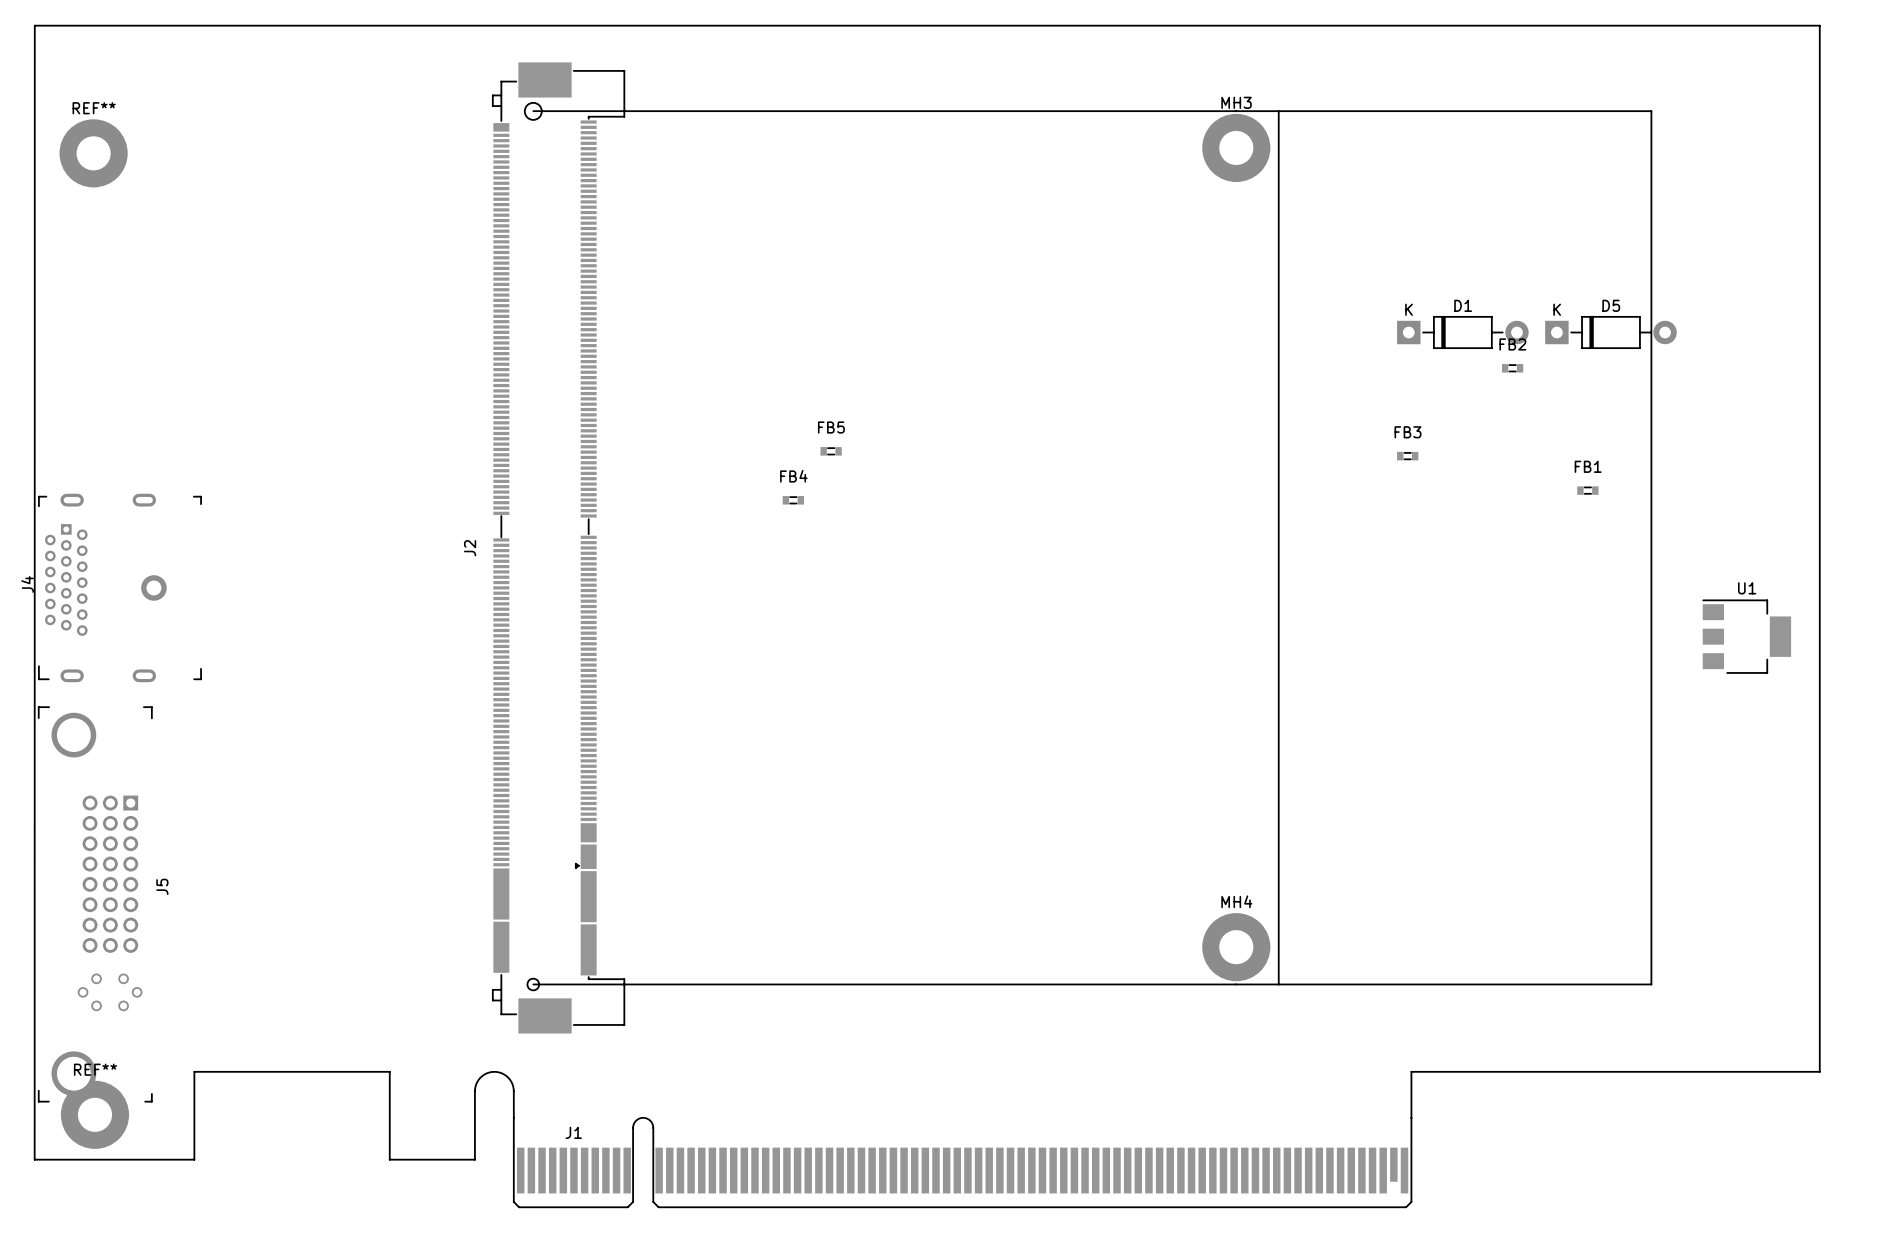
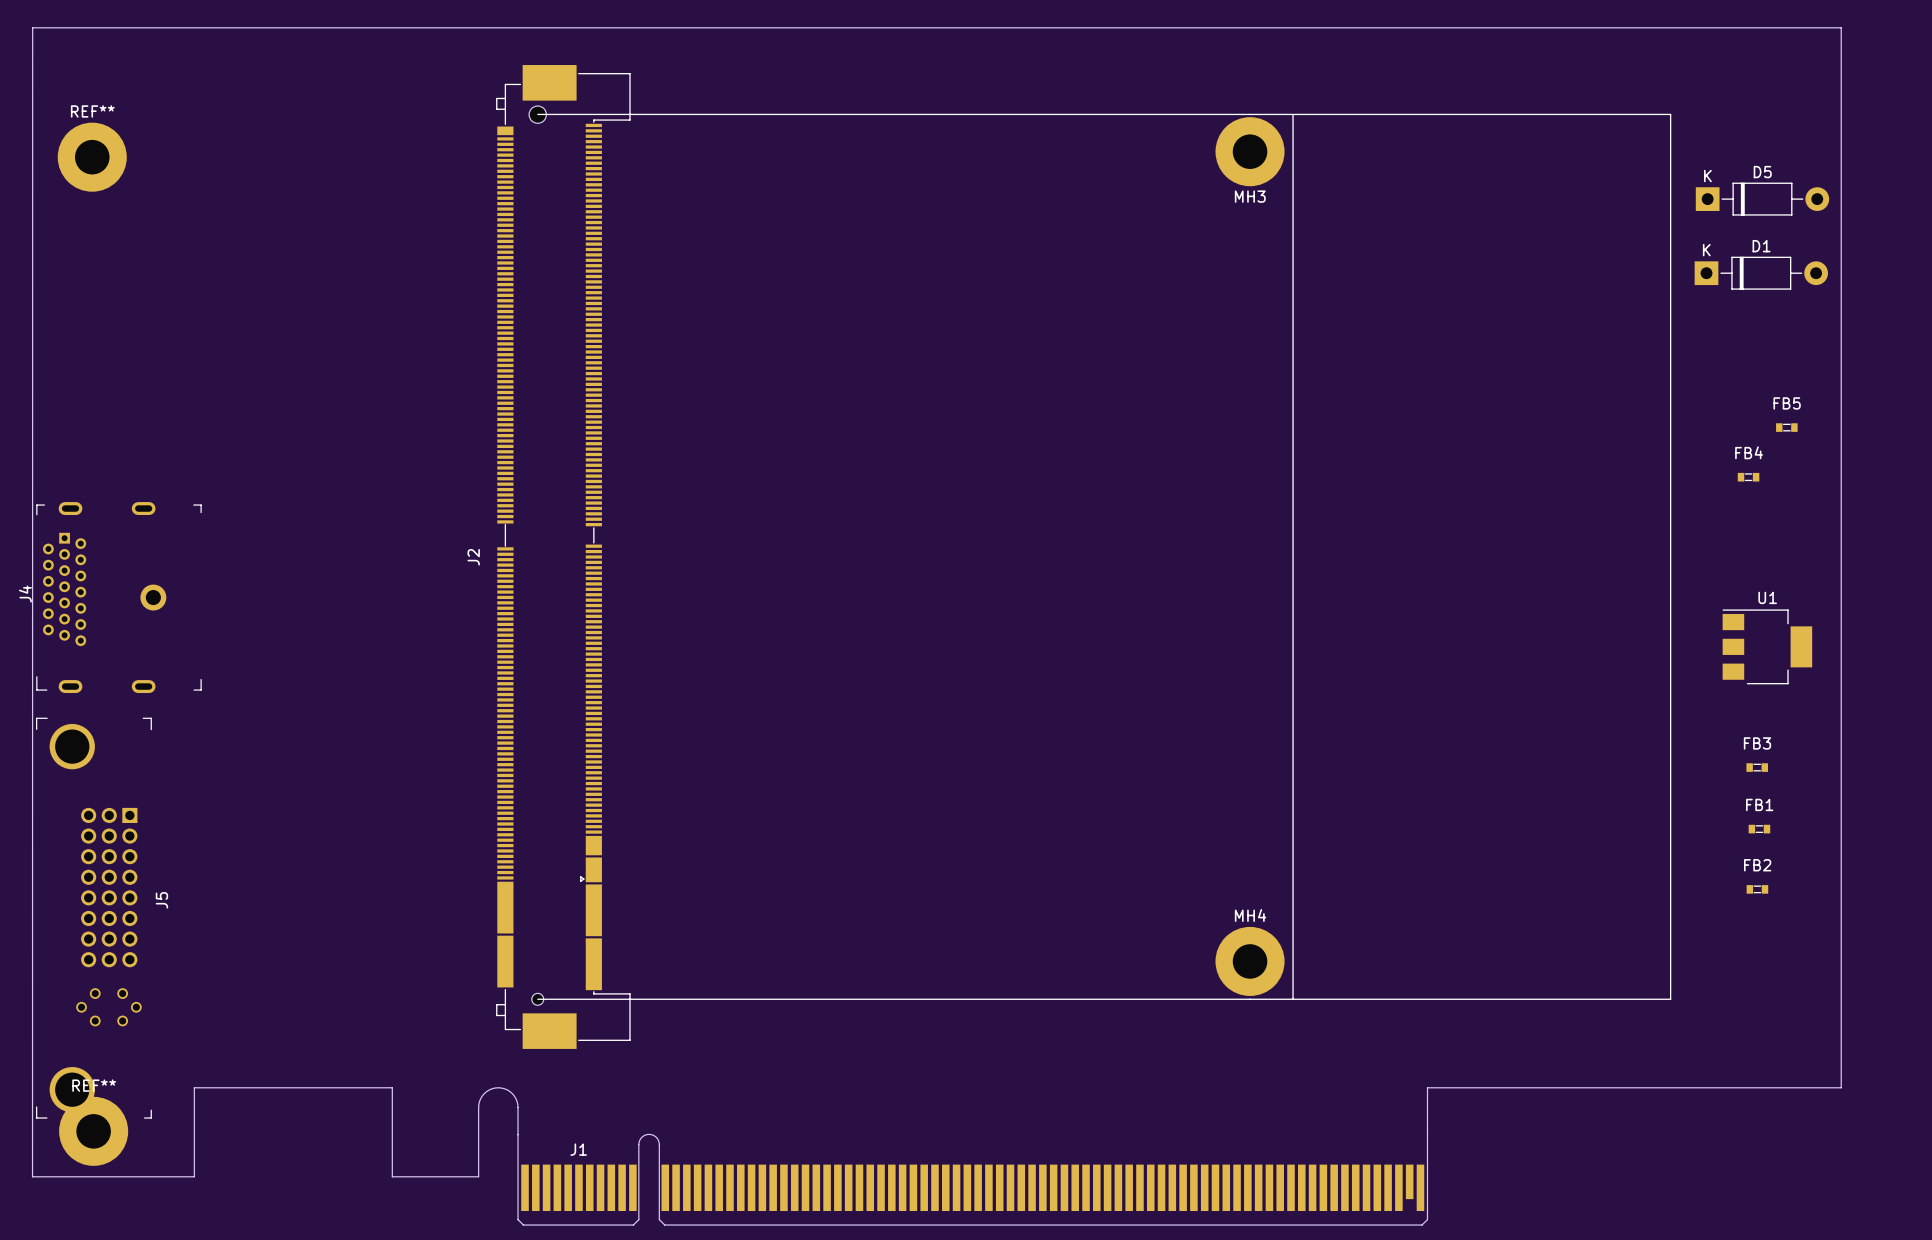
MH3 name position: MH3 (1236, 102) -> MH3 (1250, 196)
D1 position: (1462, 332) -> (1761, 273)
D5 position: (1610, 332) -> (1762, 199)
FB2 position: (1512, 368) -> (1757, 889)
FB5 position: (831, 451) -> (1786, 427)
FB3 position: (1407, 456) -> (1757, 767)
FB1 position: (1587, 490) -> (1759, 829)
FB4 position: (793, 500) -> (1748, 477)

